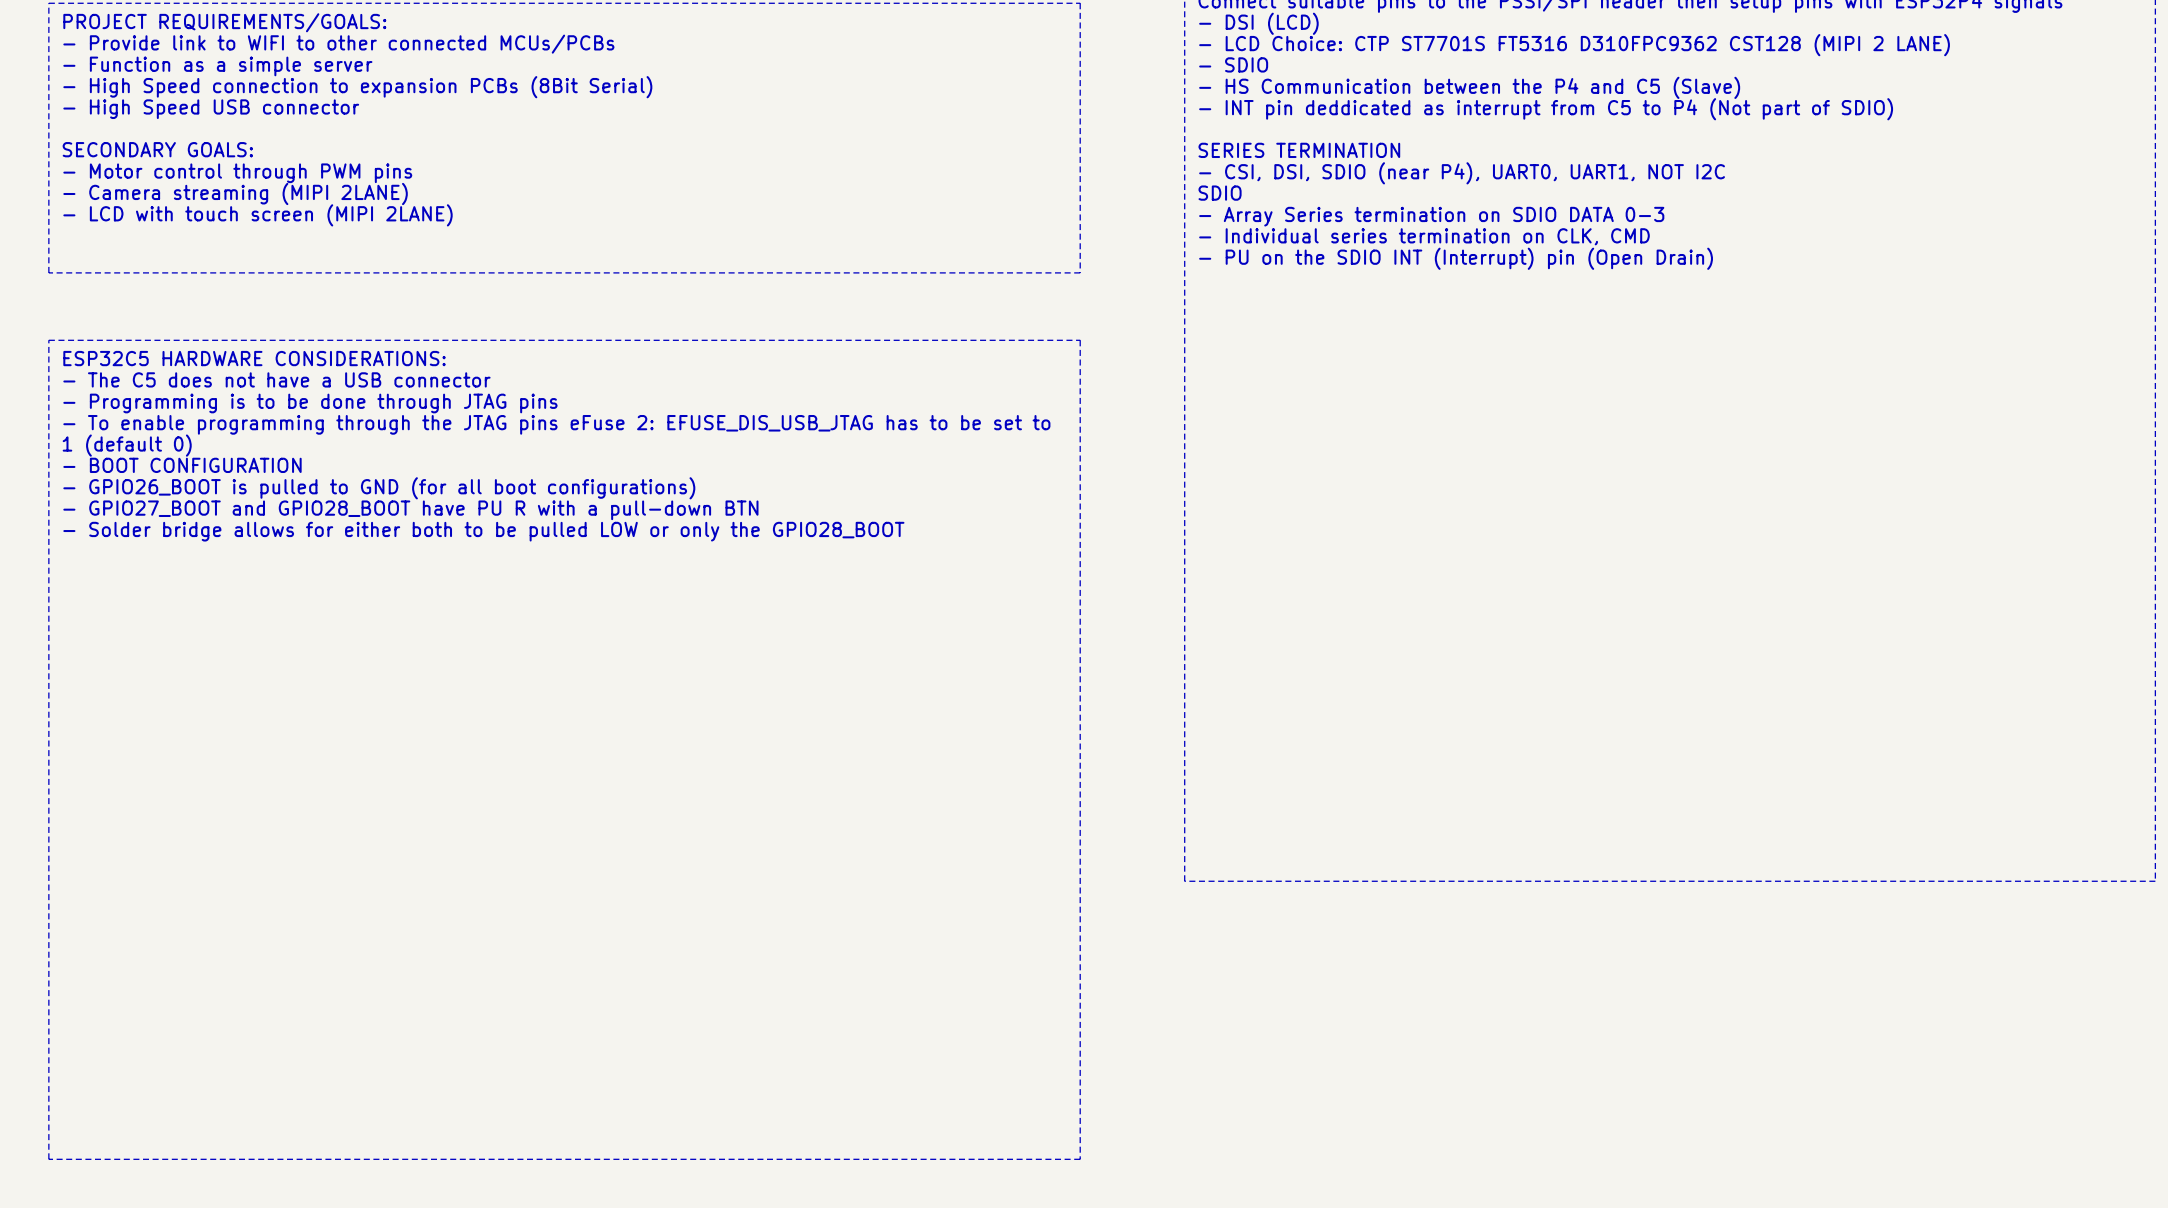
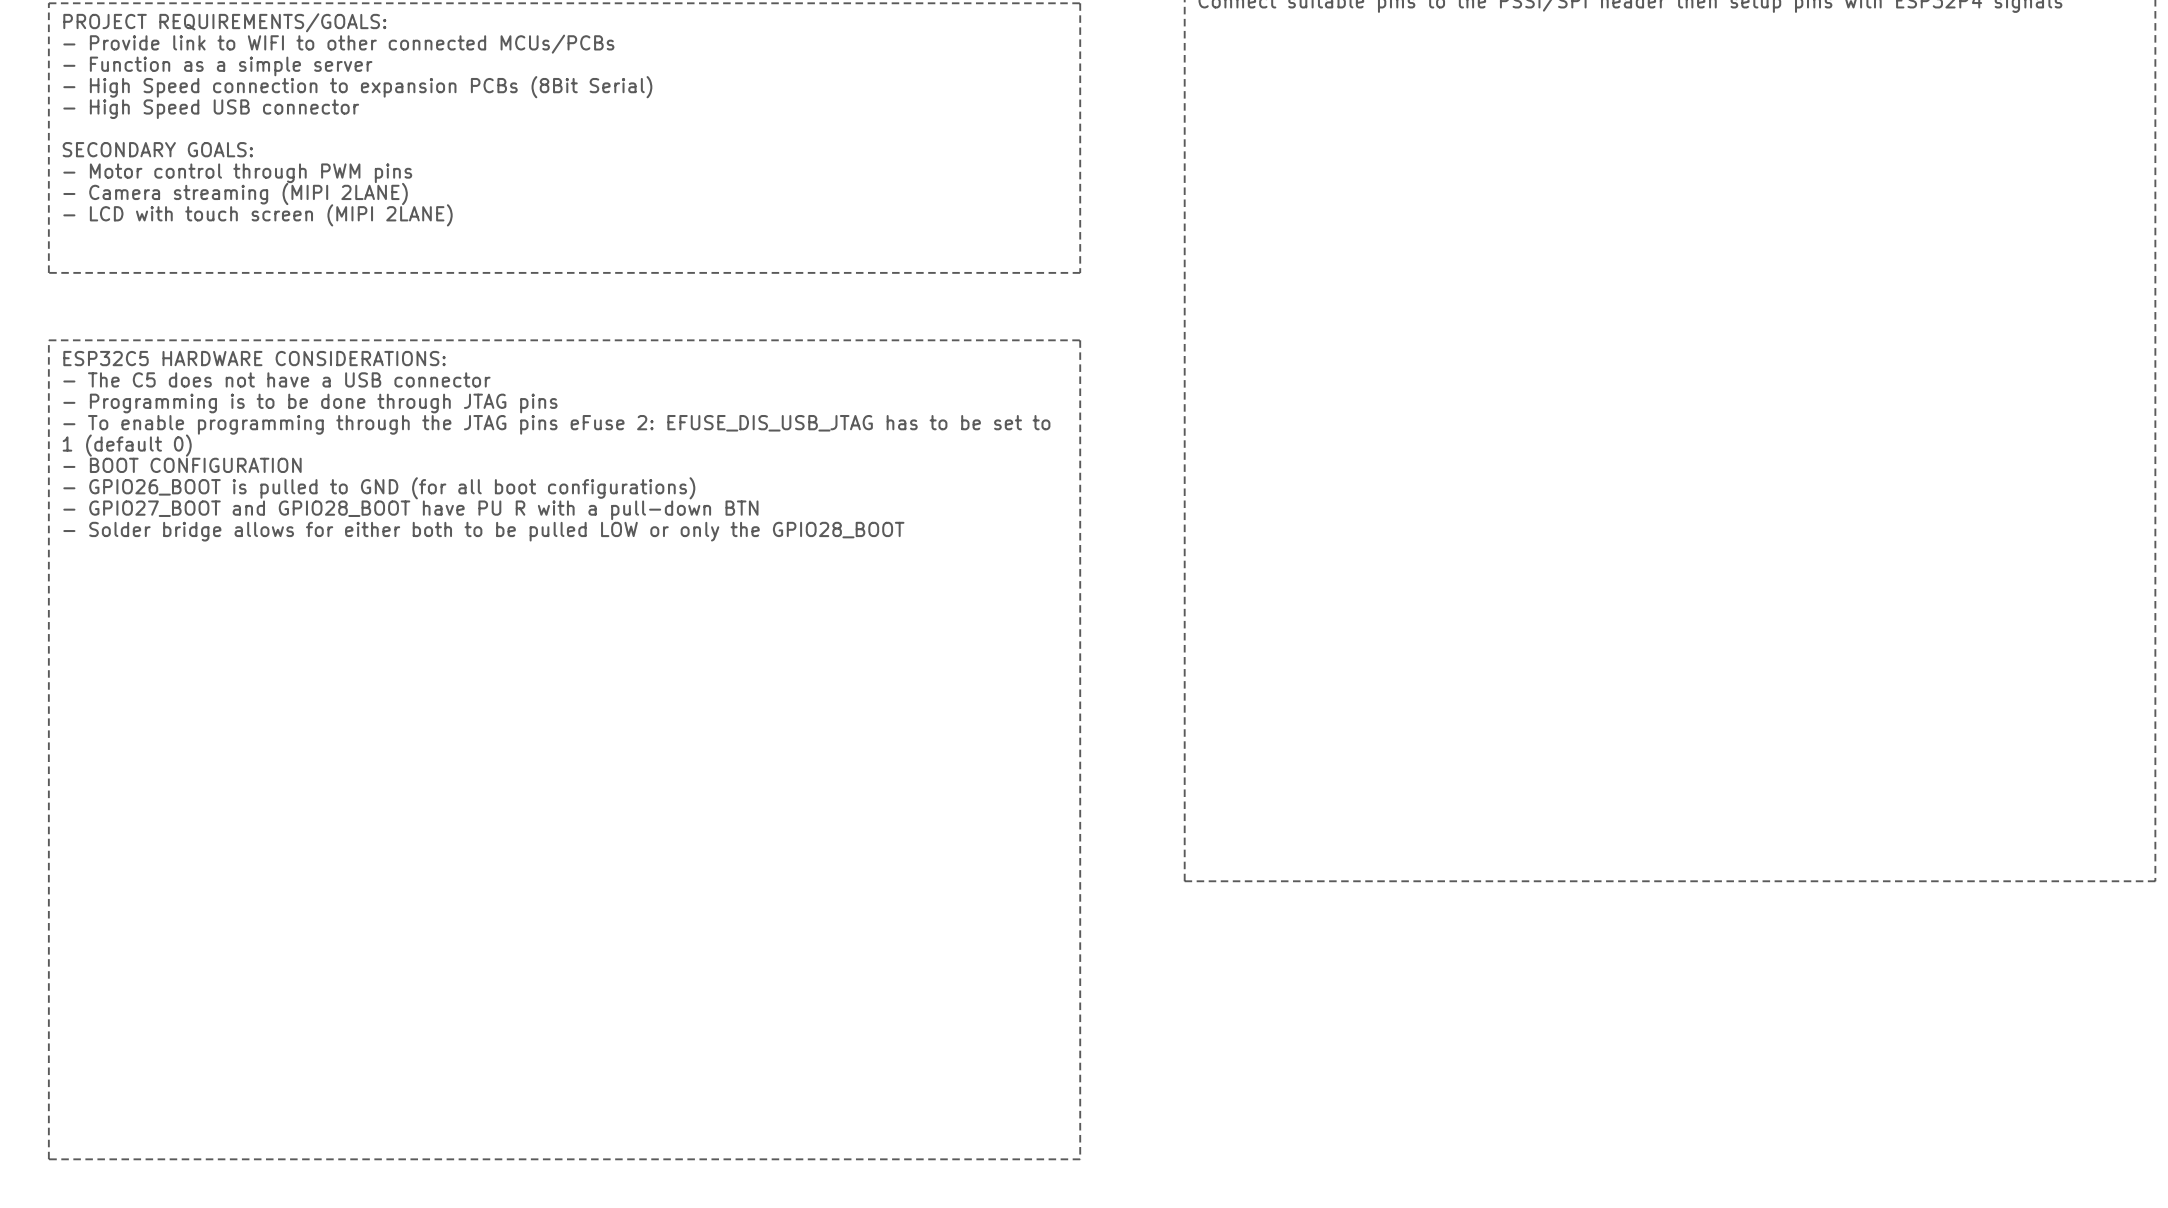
text: - DSI (LCD) (1258, 23) -> none
text: - LCD Choice: CTP ST7701S FT5316 D310FPC9362 CST128 (MIPI 2 LANE) (1574, 45) -> none
text: - SDIO (1233, 64) -> none
text: - HS Communication between the P4 and C5 (Slave) (1469, 87) -> none
text: - INT pin deddicated as interrupt from C5 to P4 (Not part of SDIO) (1546, 109) -> none
text: SERIES TERMINATION (1299, 150) -> none
text: - CSI, DSI, SDIO (near P4), UART0, UART1, NOT I2C (1462, 173) -> none
text: SDIO (1220, 193) -> none
text: - Array Series termination on SDIO DATA 0-3 (1431, 216) -> none
text: - Individual series termination on CLK, CMD (1424, 236) -> none
text: - PU on the SDIO INT (Interrupt) pin (Open Drain) (1456, 258) -> none

